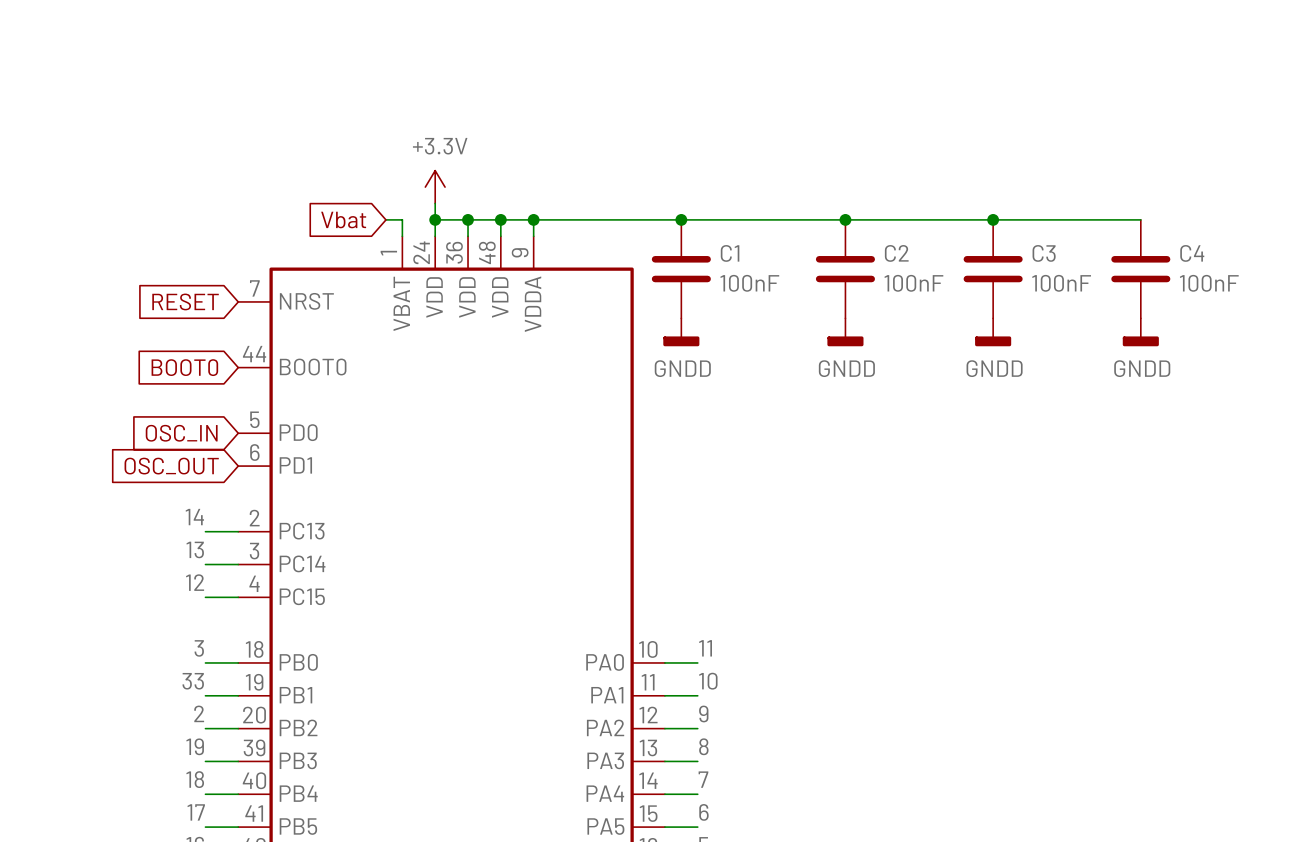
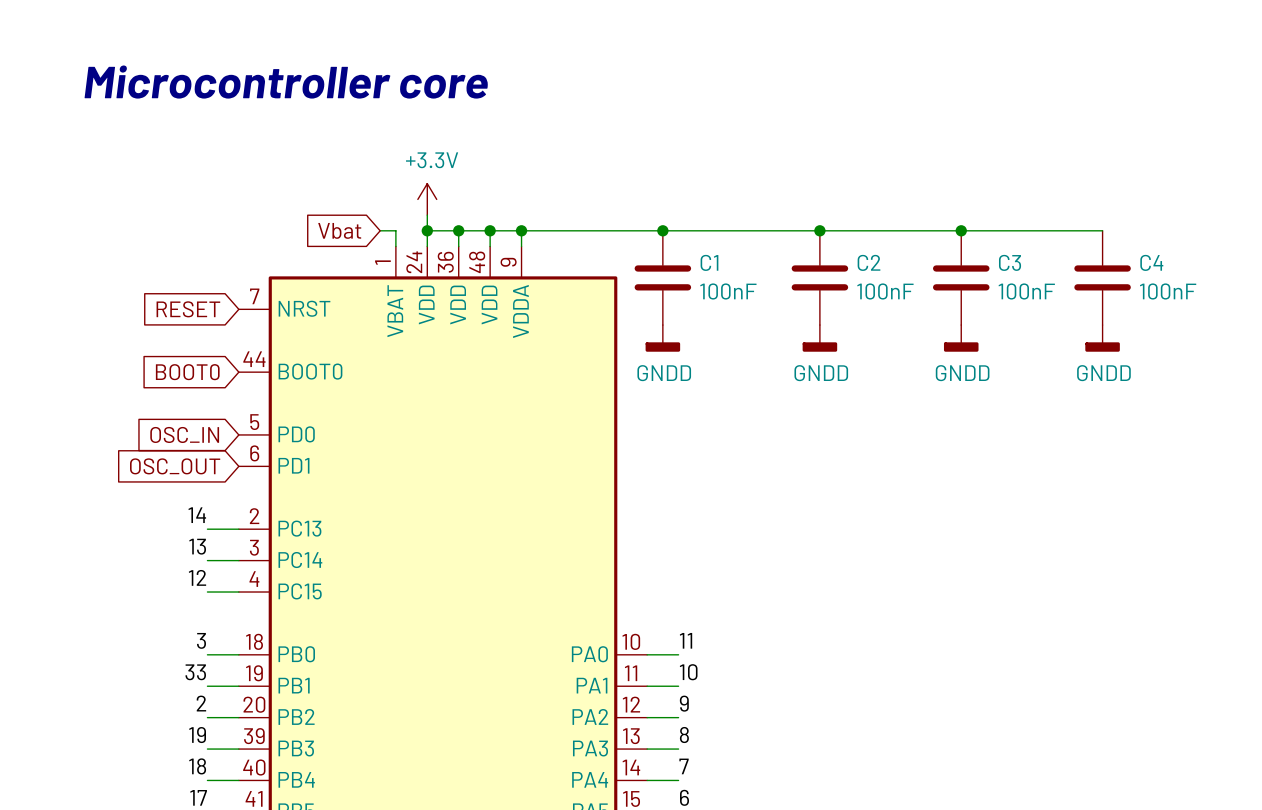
text: none -> Microcontroller core (286, 82)

